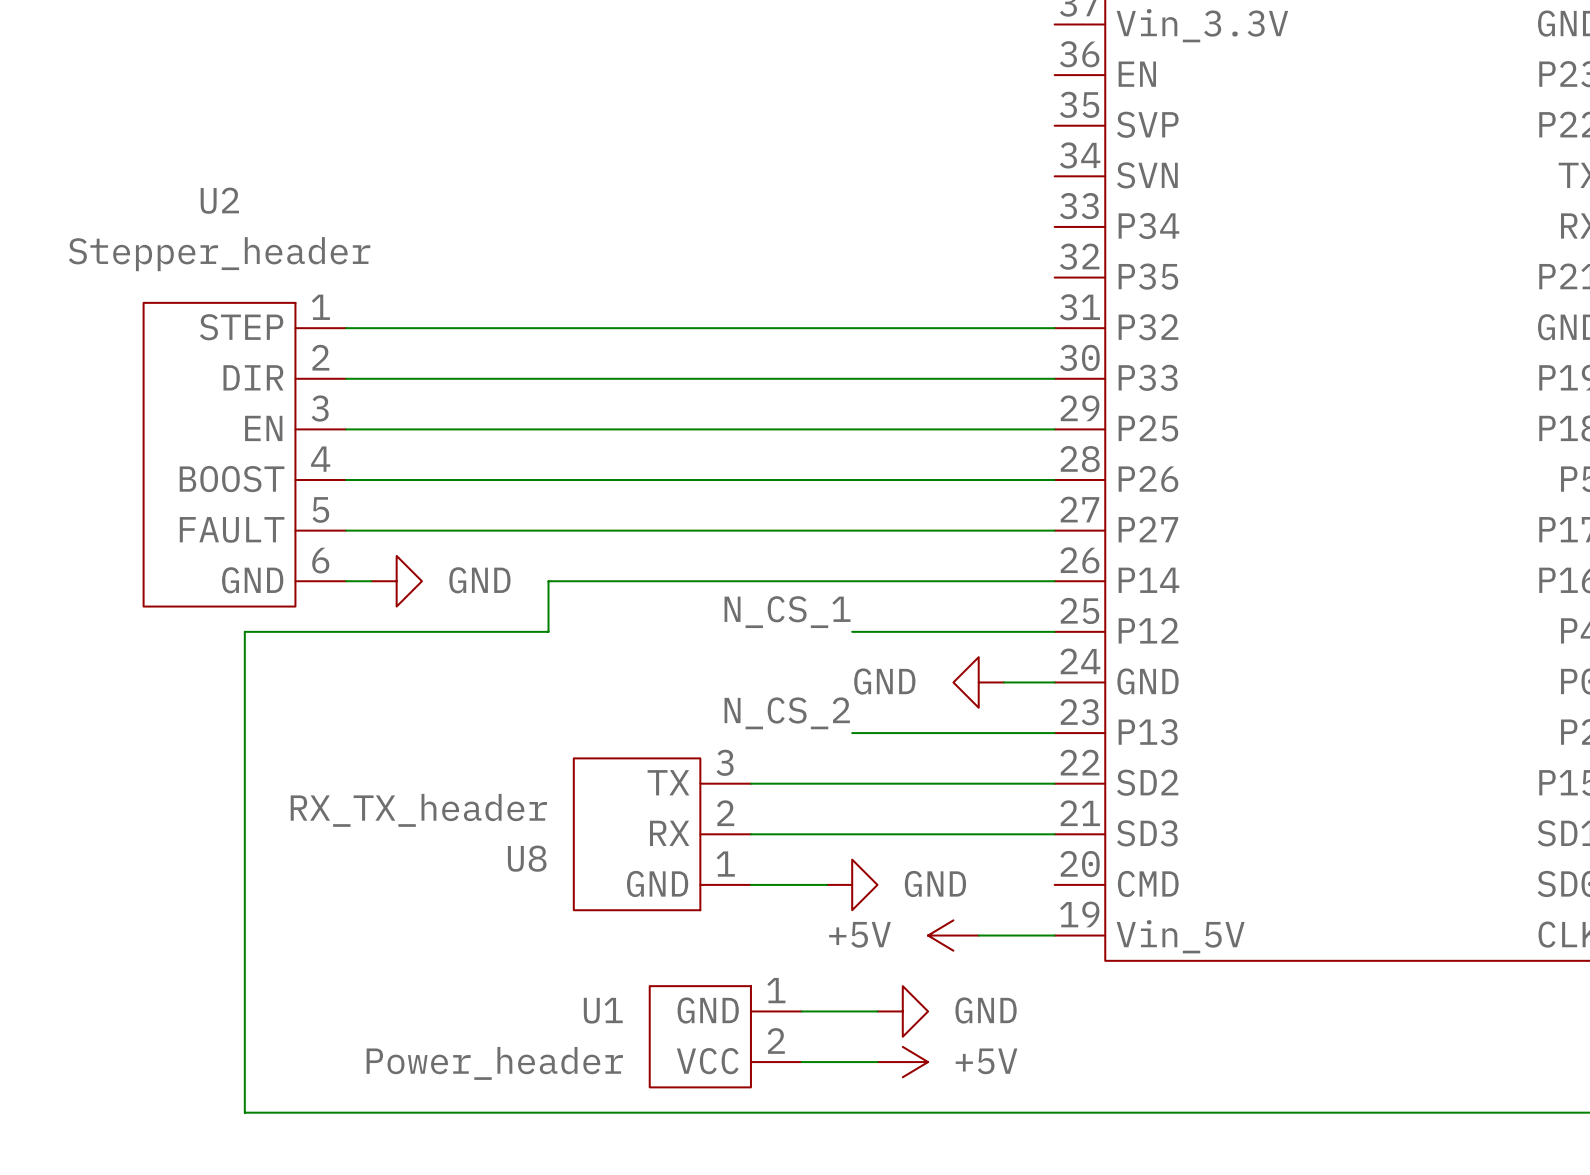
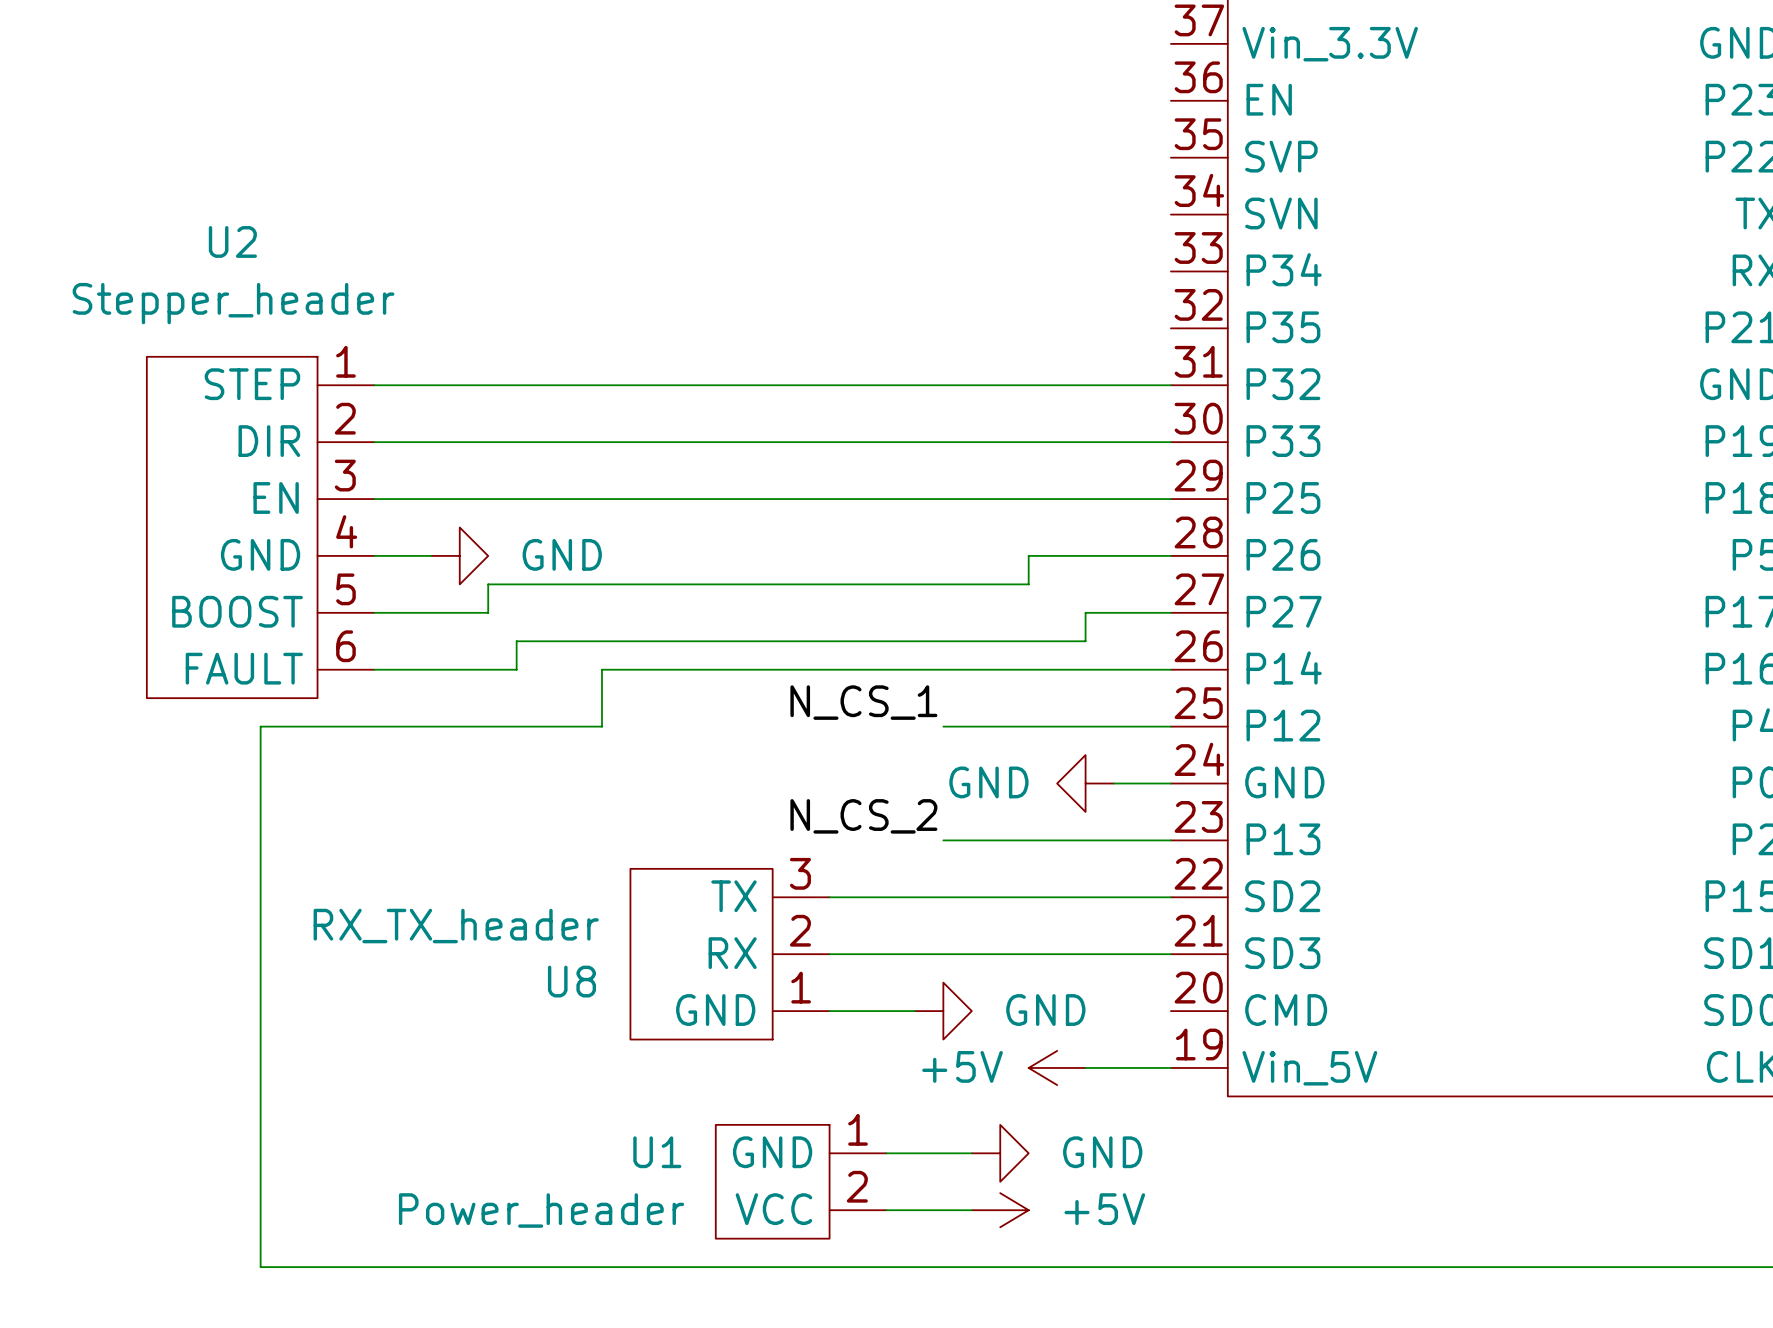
U2 pin name: BOOST (232, 479) -> GND (260, 554)
wire: (396, 480) (928, 480) -> (488, 612) (488, 584) (1028, 584) (1028, 555)
U2 pin name: FAULT (232, 529) -> BOOST (237, 611)
wire: (447, 530) (978, 530) -> (402, 669) (516, 669) (516, 641) (1085, 641) (1085, 612)
U2 pin name: GND (252, 580) -> FAULT (244, 668)
power symbol position: GND (396, 581) -> GND (459, 555)

